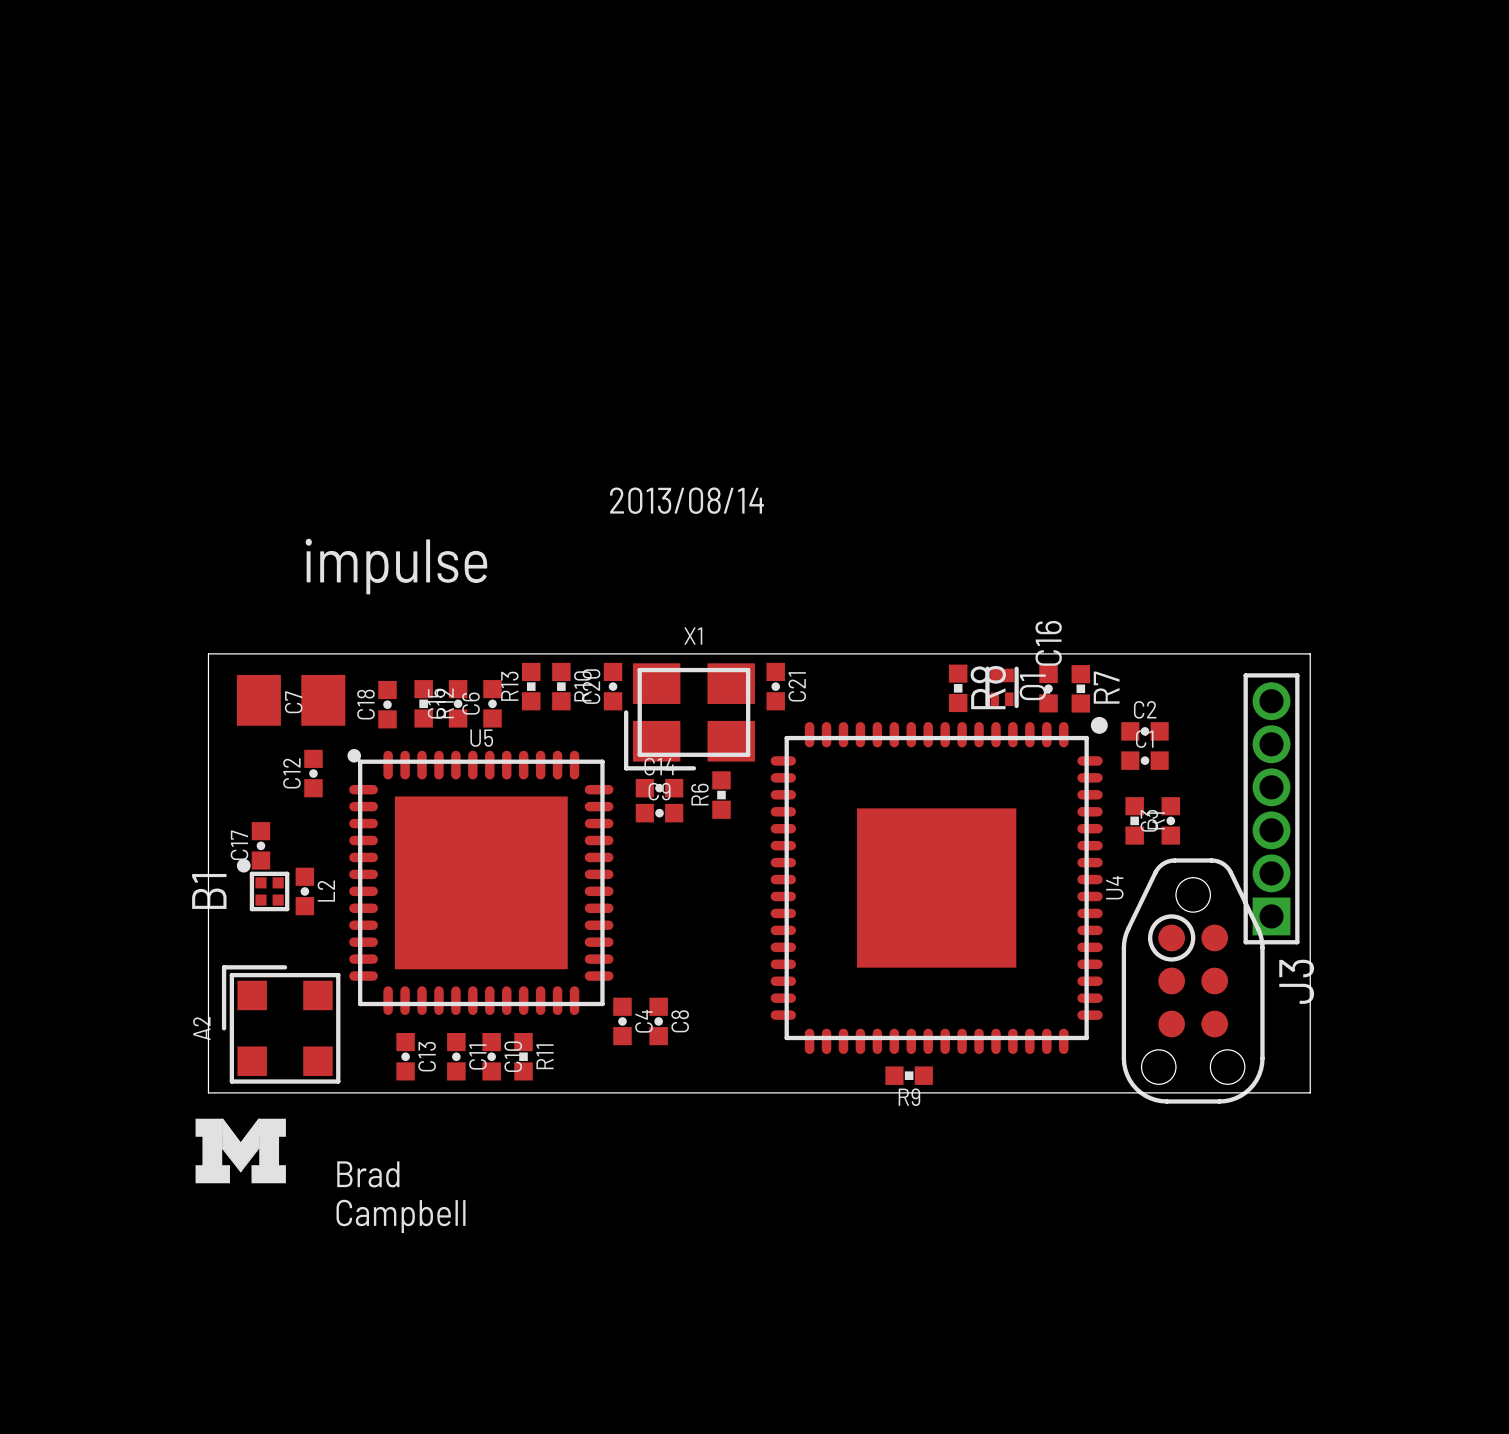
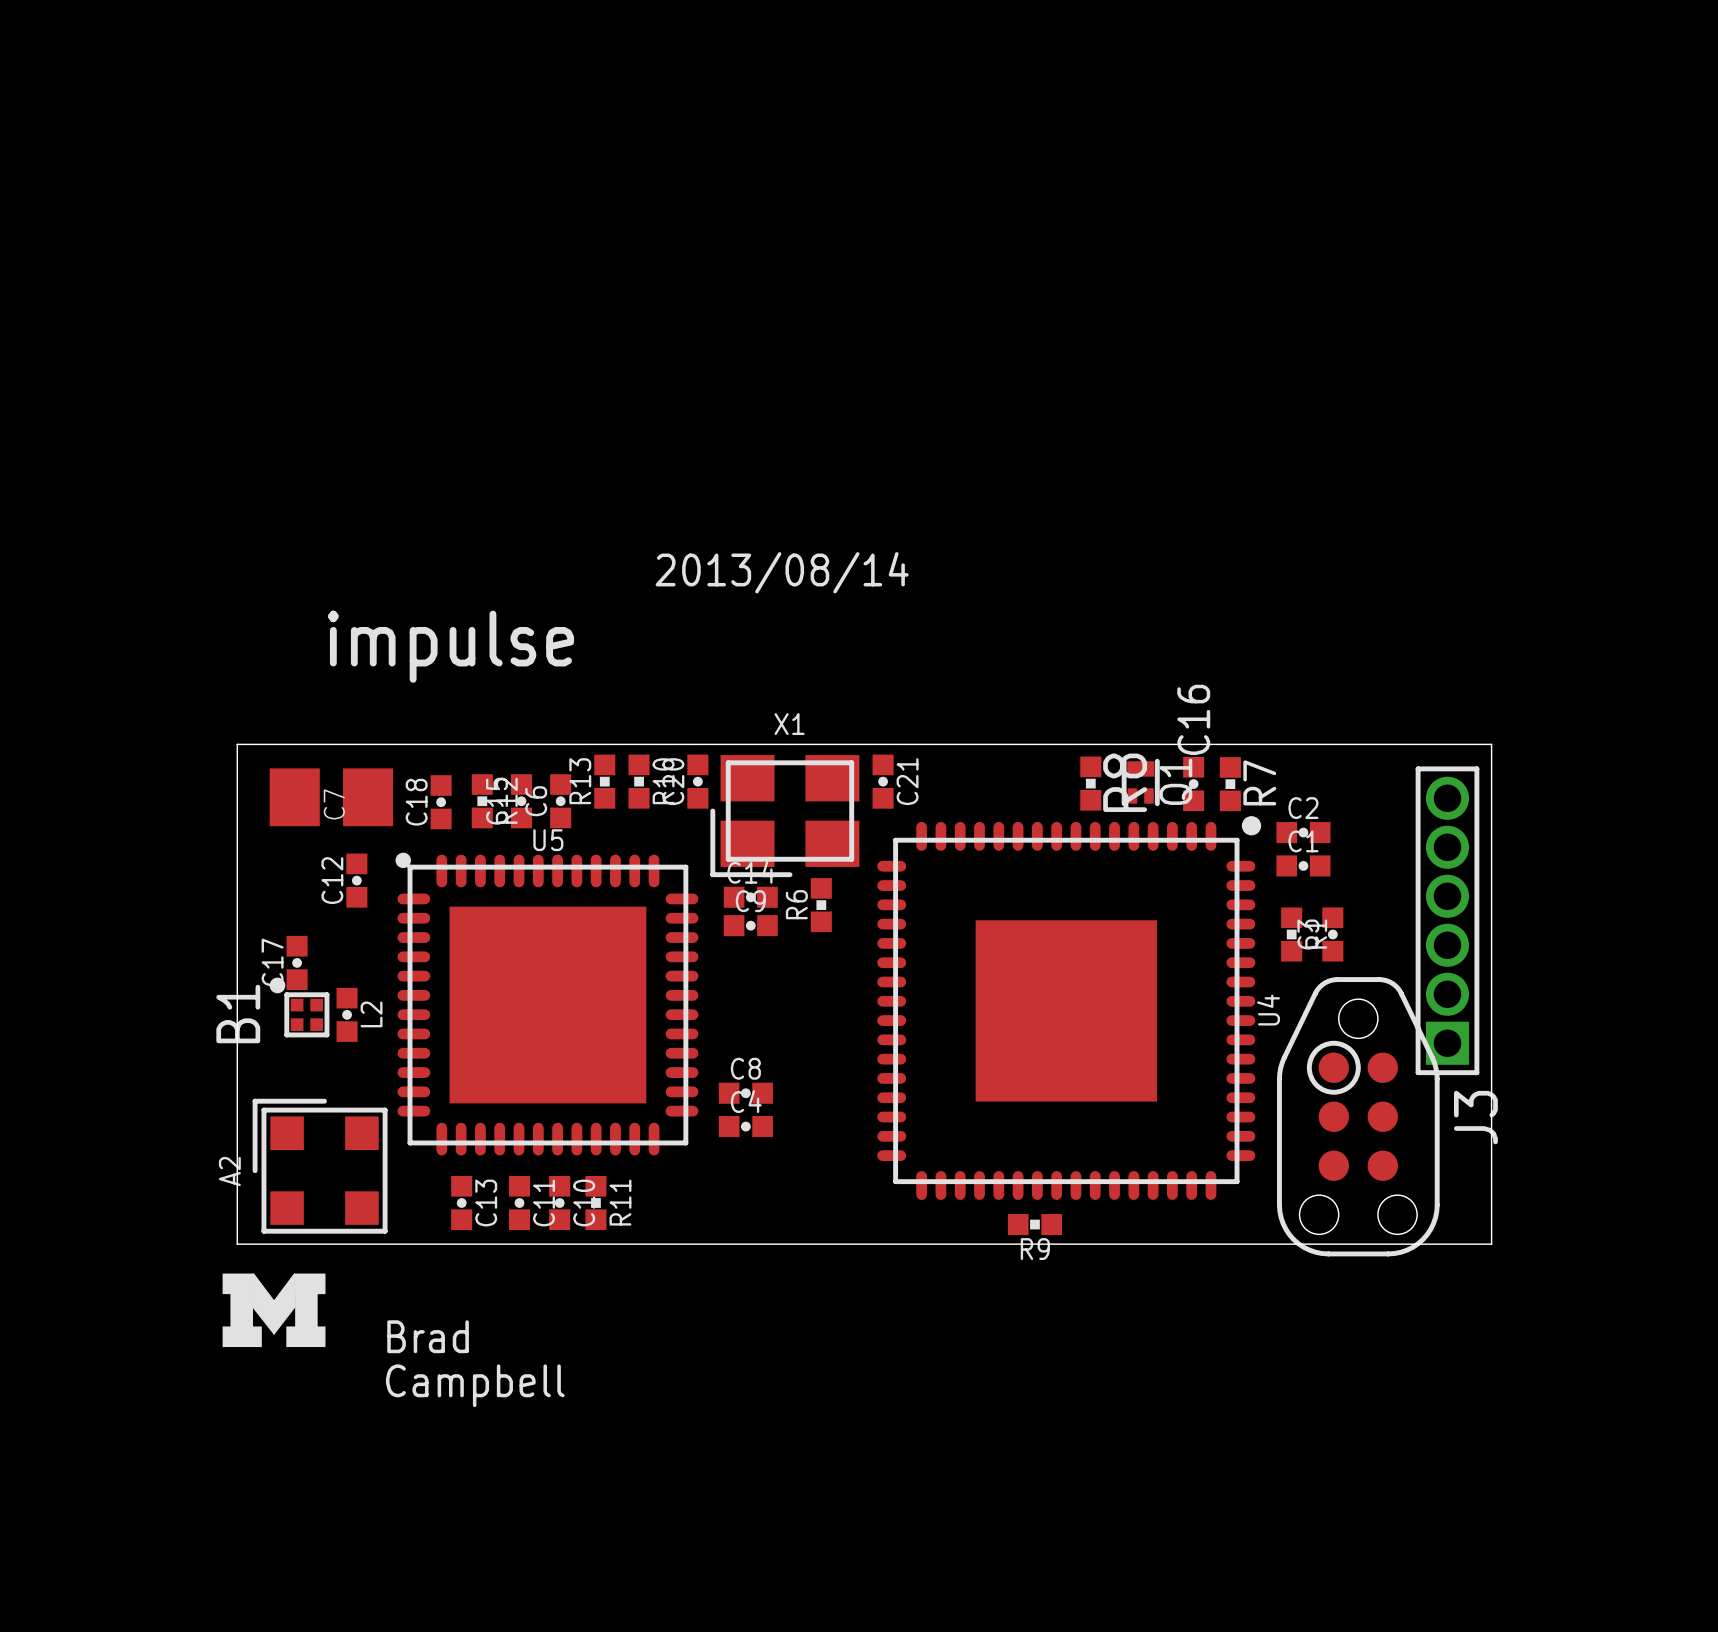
C4 rotation: 0° (622, 1021) -> 90° clockwise (745, 1126)
C4 position: (622, 1021) -> (745, 1126)
C8 rotation: 0° (658, 1021) -> 90° clockwise (745, 1093)
C8 position: (658, 1021) -> (745, 1093)

